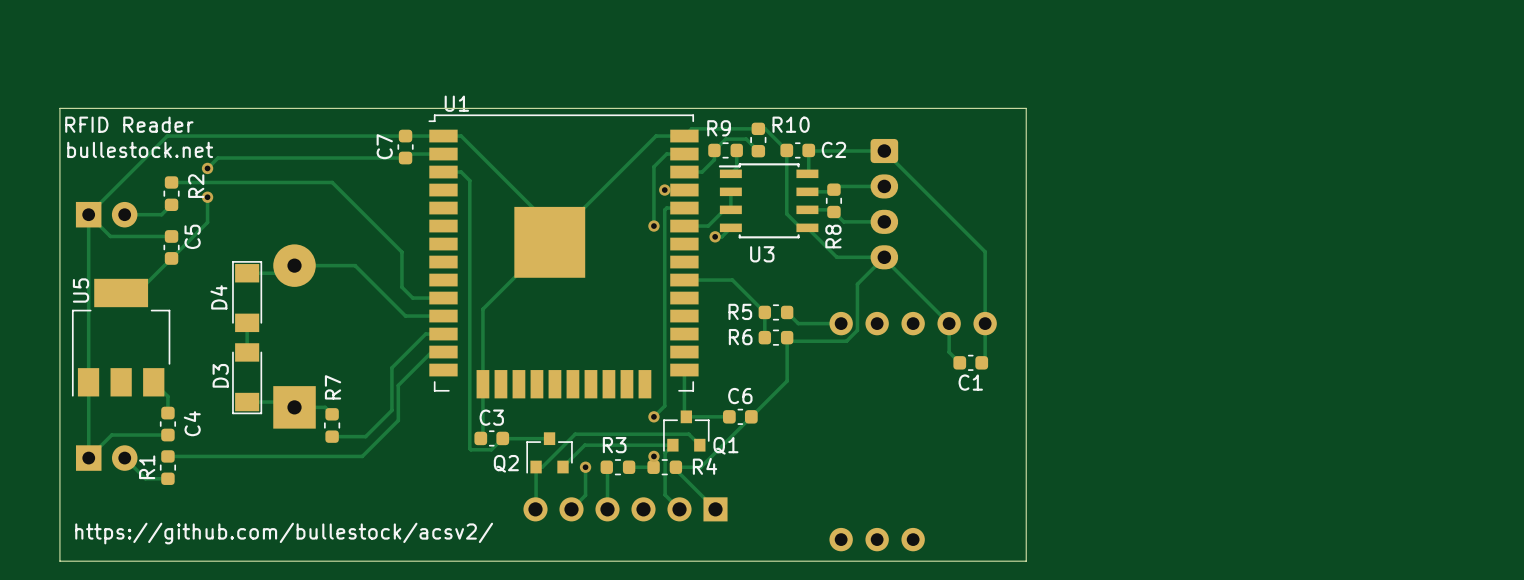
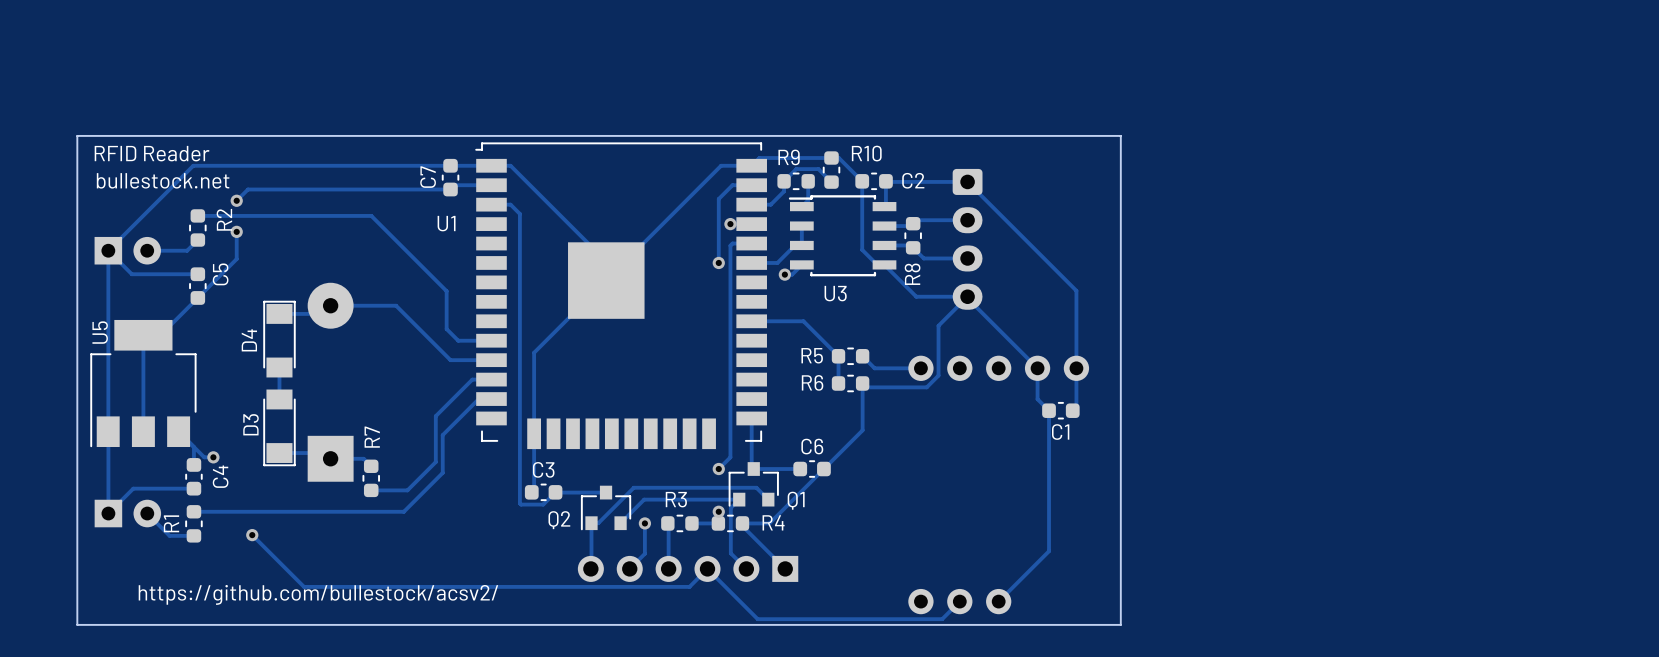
U1 name position: U1 (456, 103) -> U1 (446, 223)
track: none -> (143, 335) (143, 431)
track: none -> (1049, 410) (1049, 551) (998, 601)
track: none -> (193, 447) (204, 457) (213, 457)
via: none -> (213, 457)
track: none -> (252, 535) (304, 586) (689, 586) (707, 568) (757, 619) (942, 619) (959, 601)
via: none -> (252, 535)

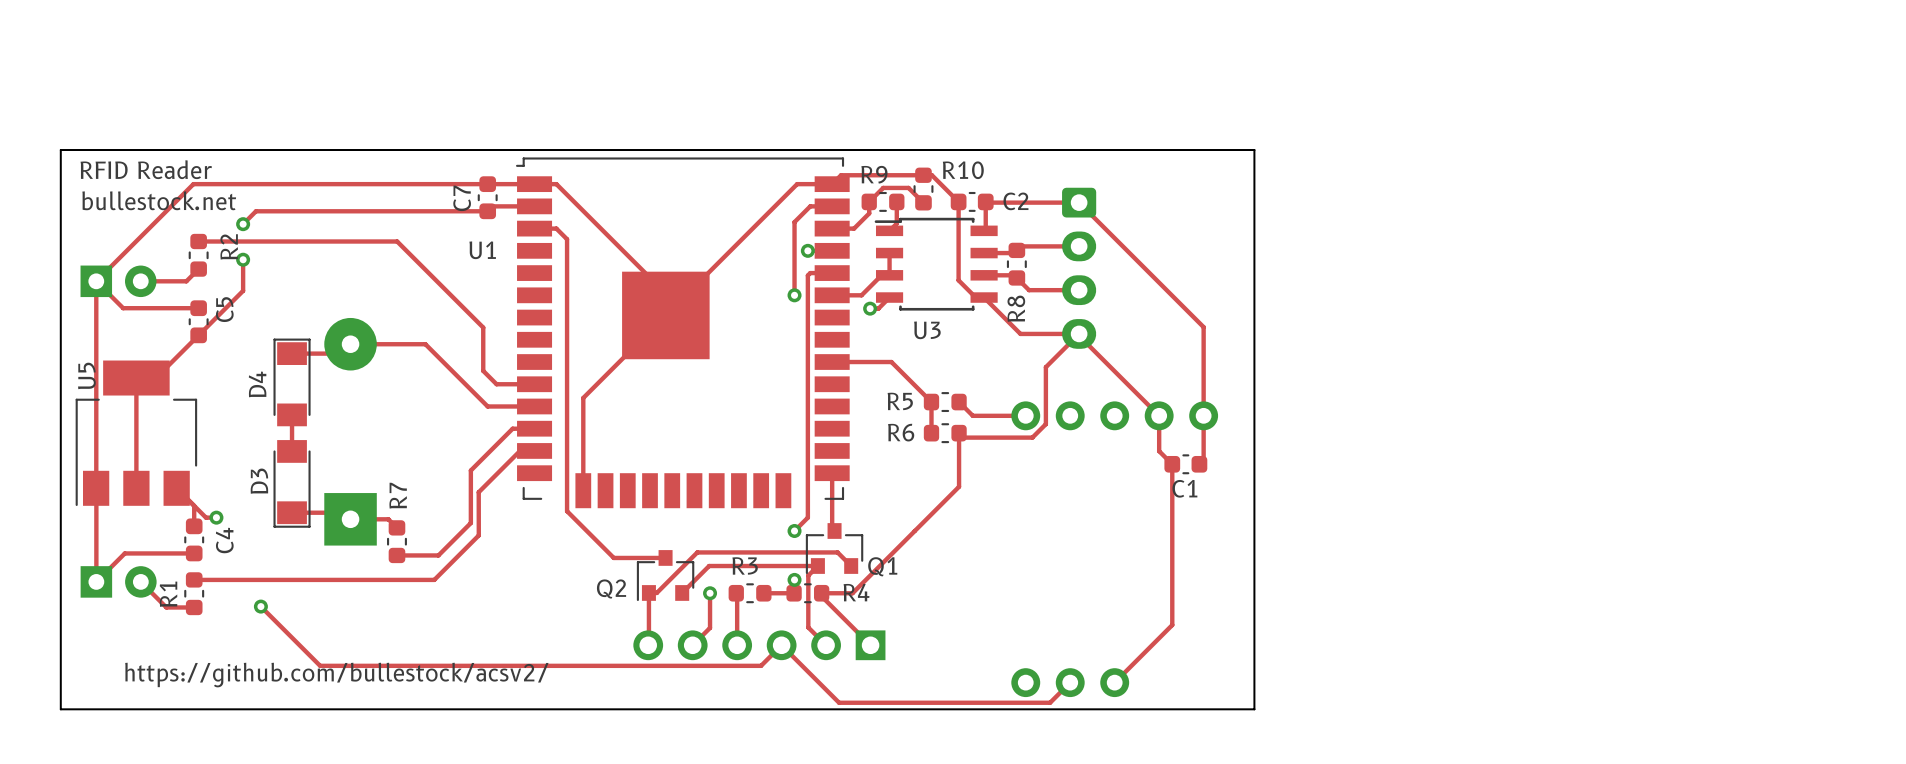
track: (534, 433) (534, 490) (531, 492) -> none
track: (519, 451) (519, 503) (543, 504) (555, 492) (560, 492) -> (567, 511) (613, 557)
track: (753, 469) (800, 469) -> none
C6: (812, 469) -> none
C3: (543, 492) -> none

